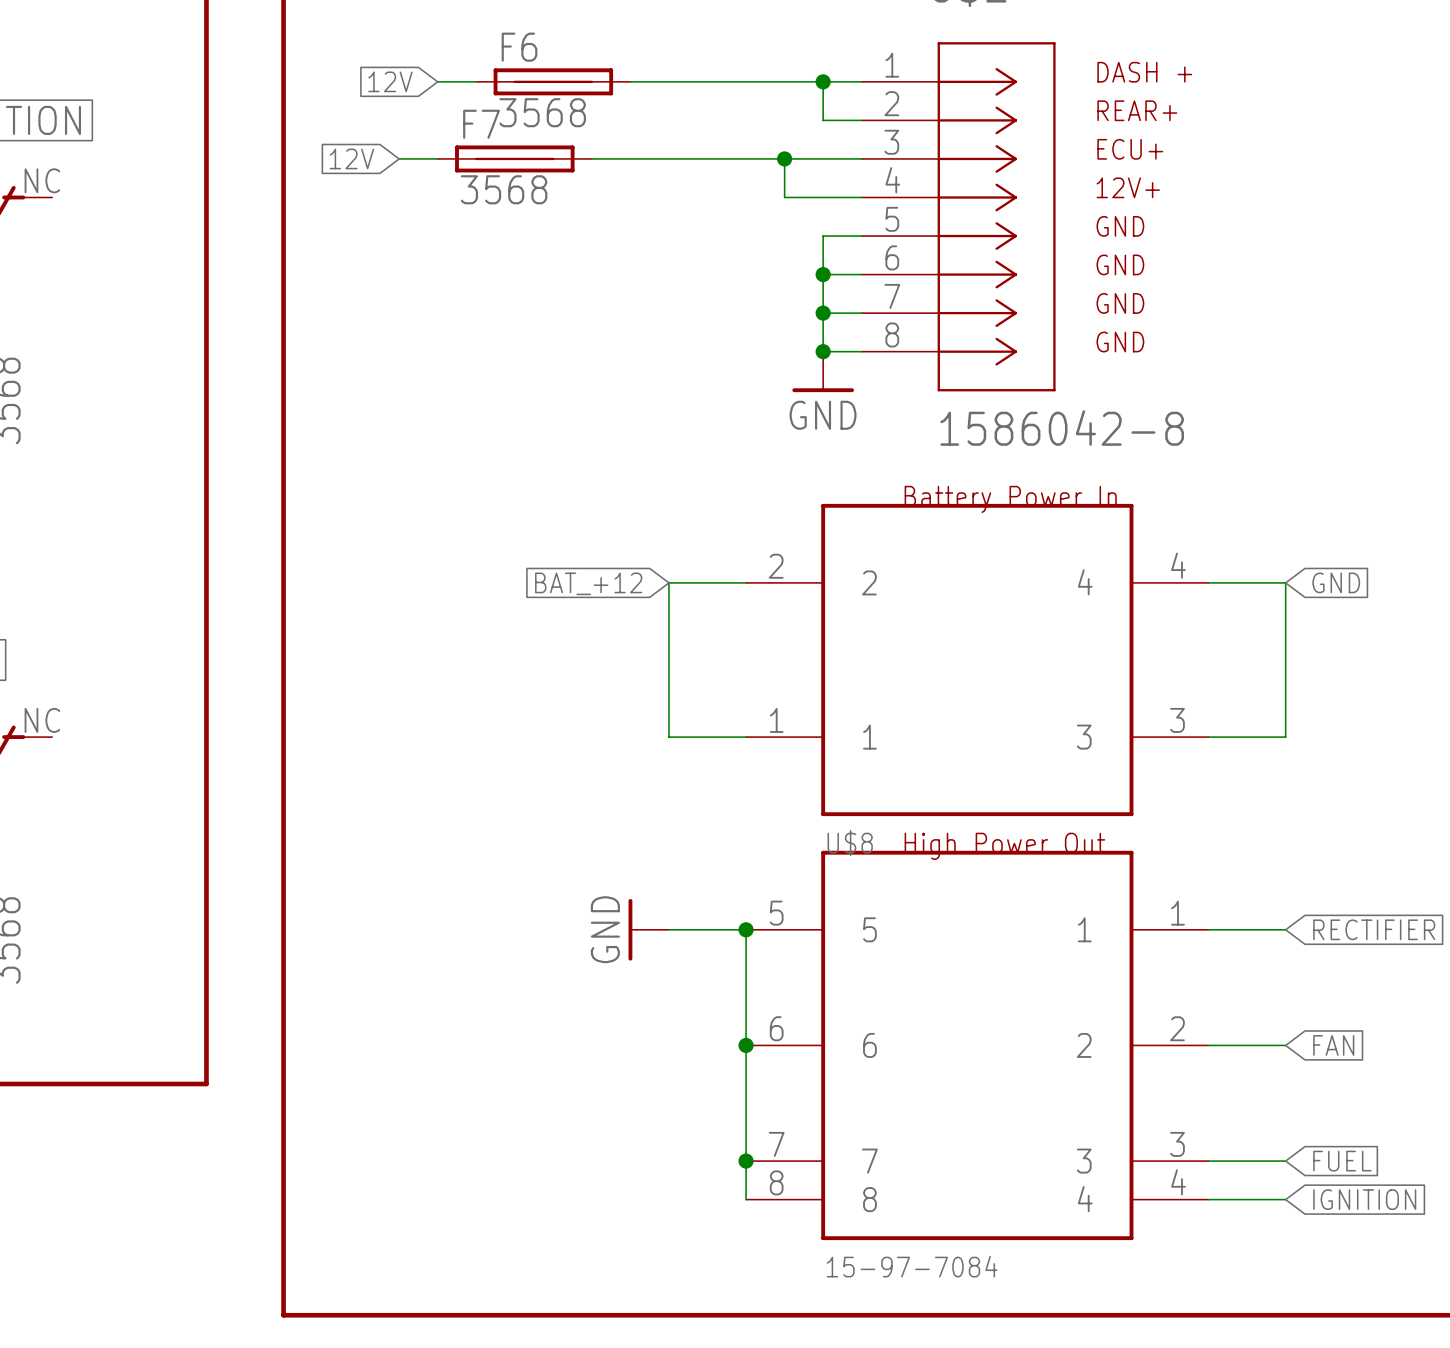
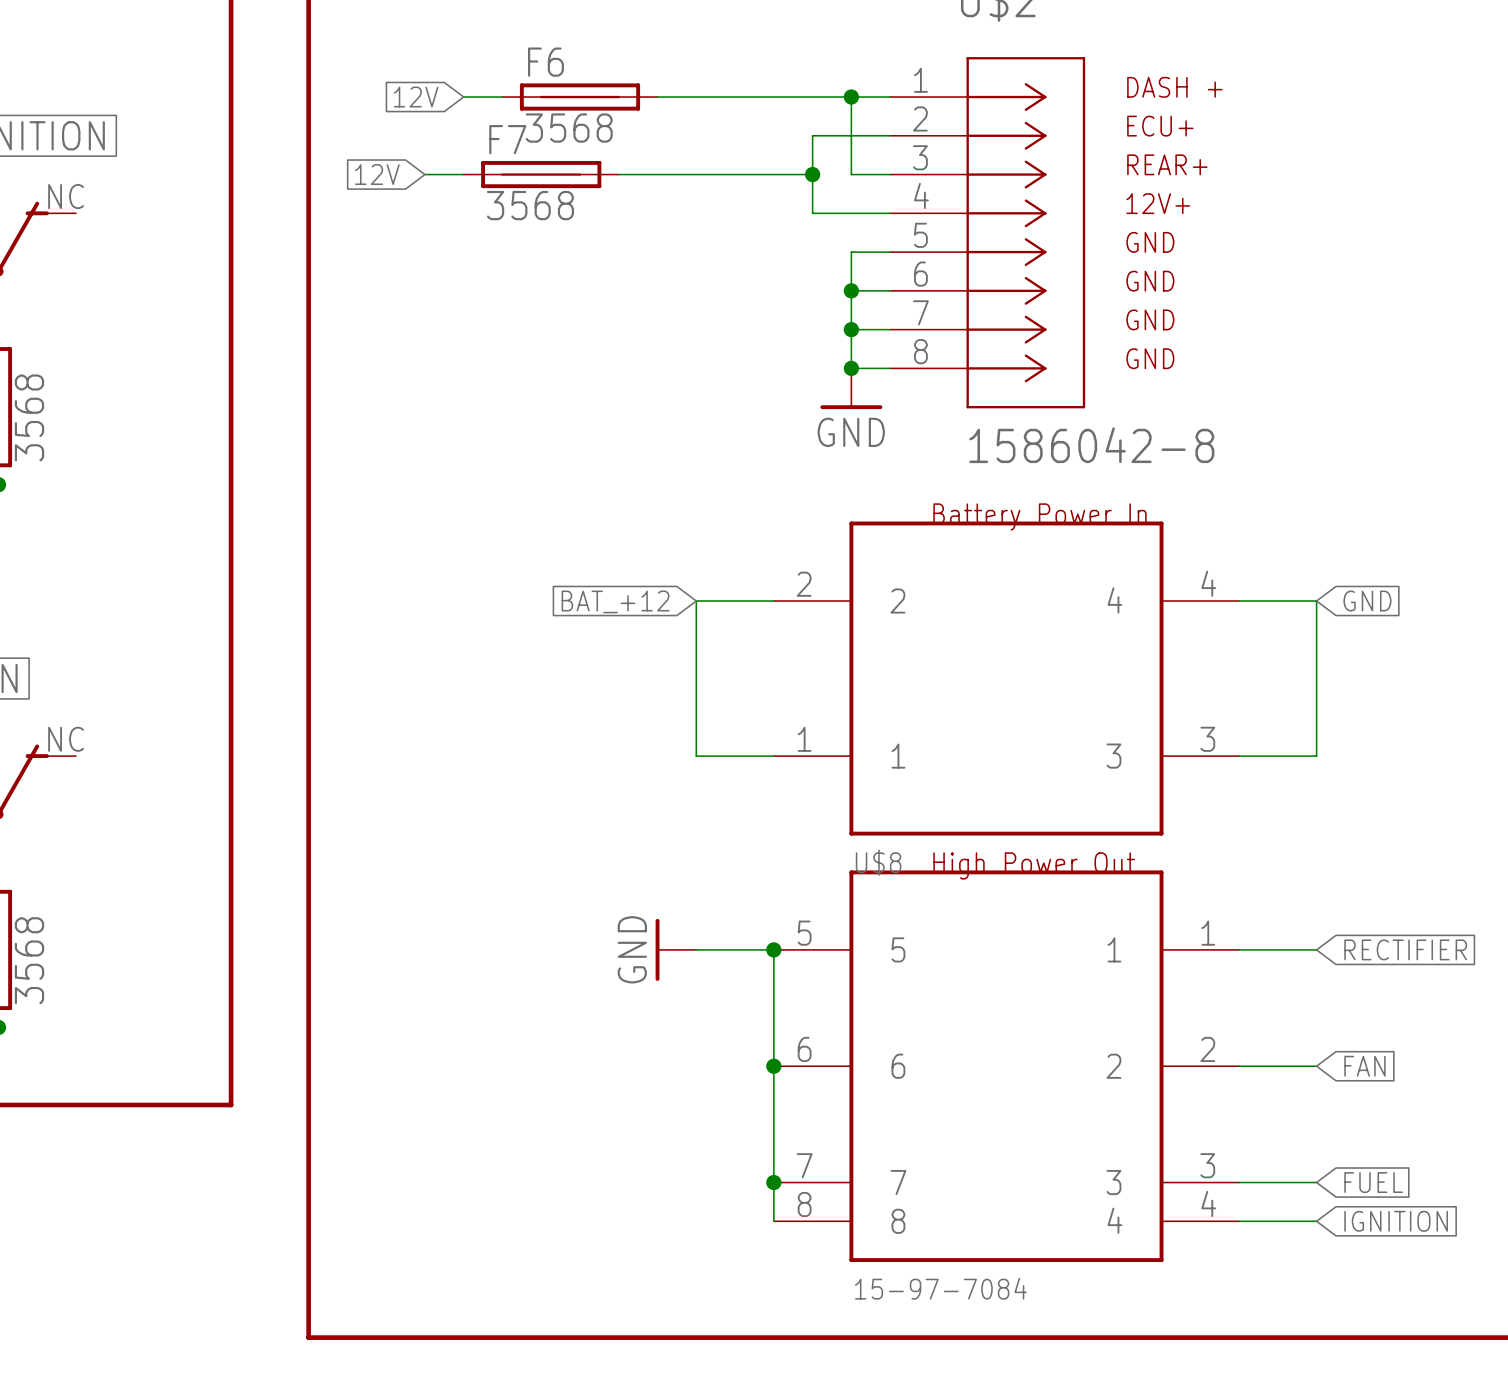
text: REAR+ (1137, 110) -> ECU+ (1160, 126)
text: ECU+ (1130, 149) -> REAR+ (1167, 164)
wire: (784, 158) (823, 158) -> (812, 174) (812, 135) (851, 135) (851, 174)

